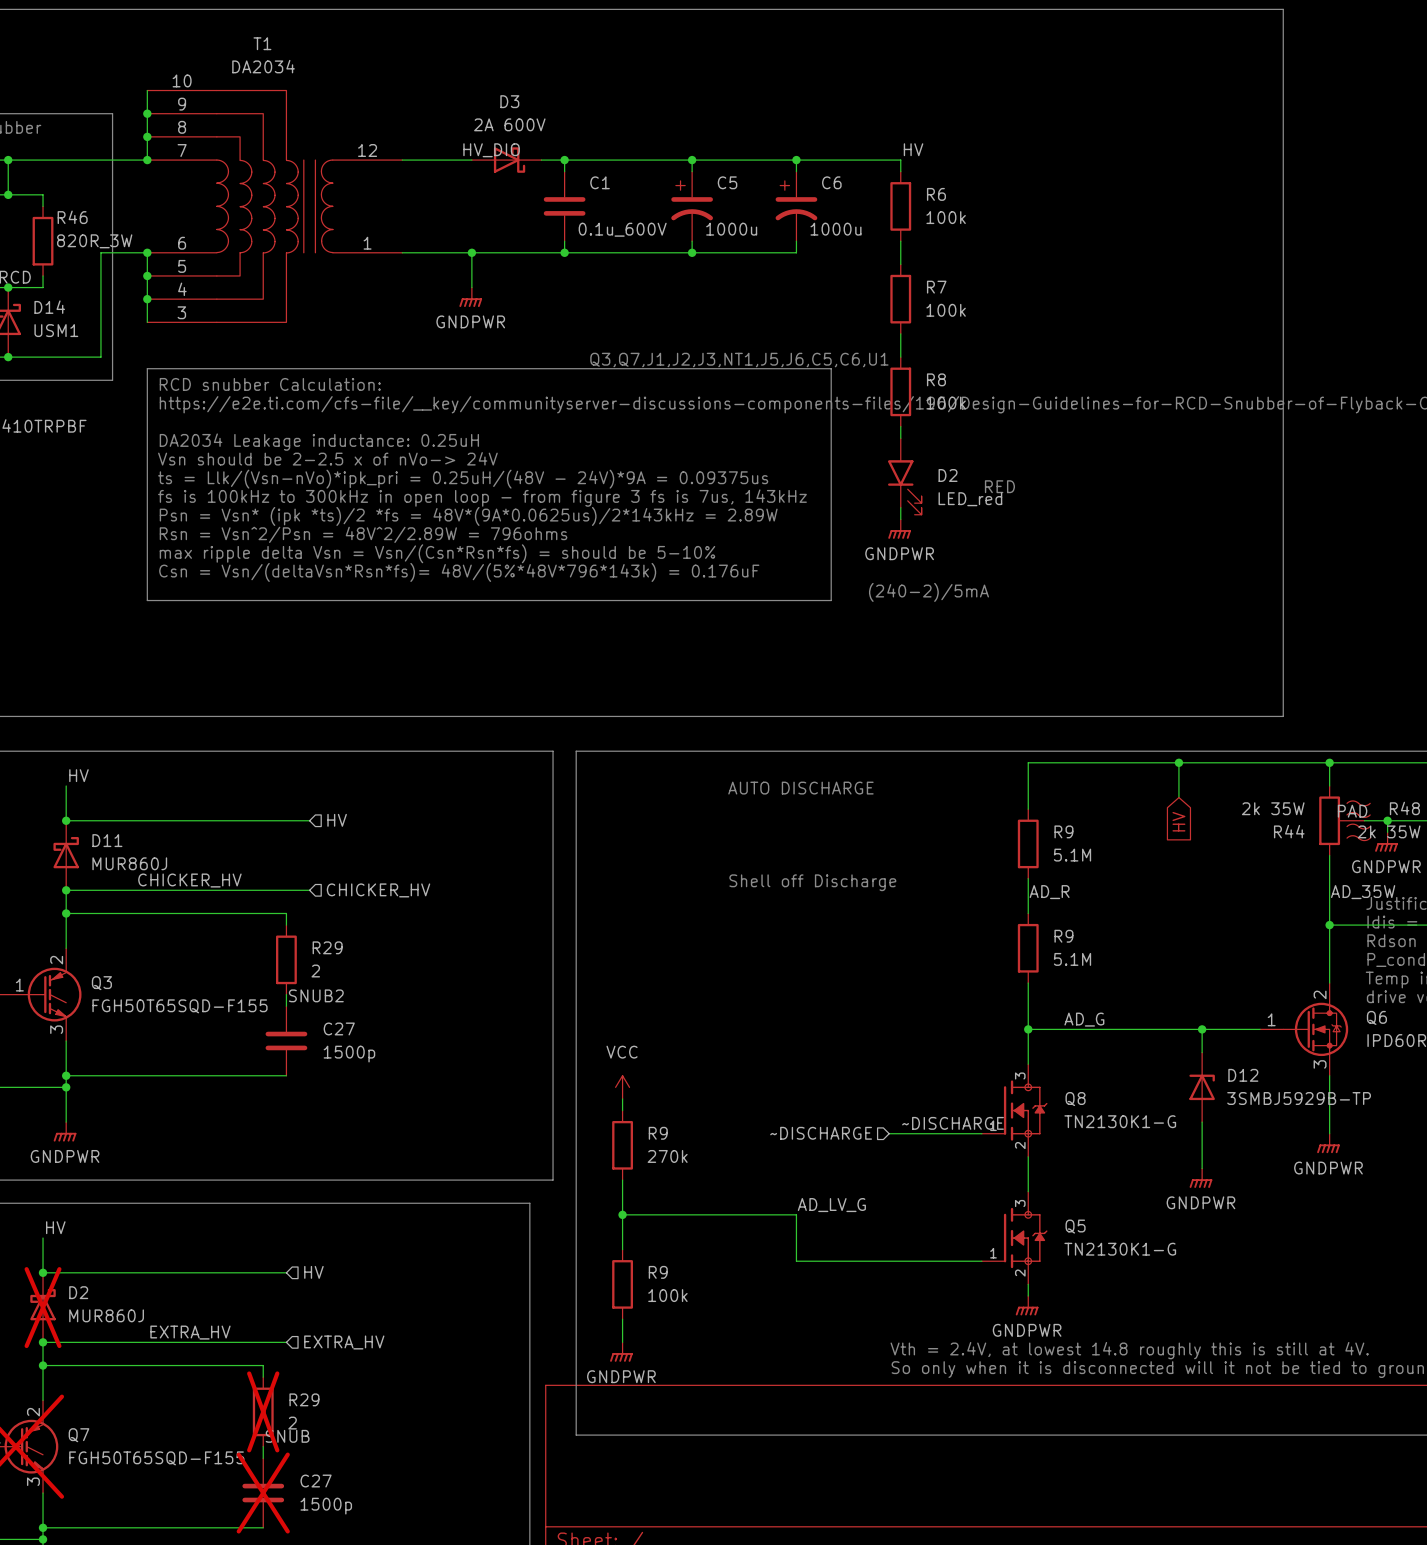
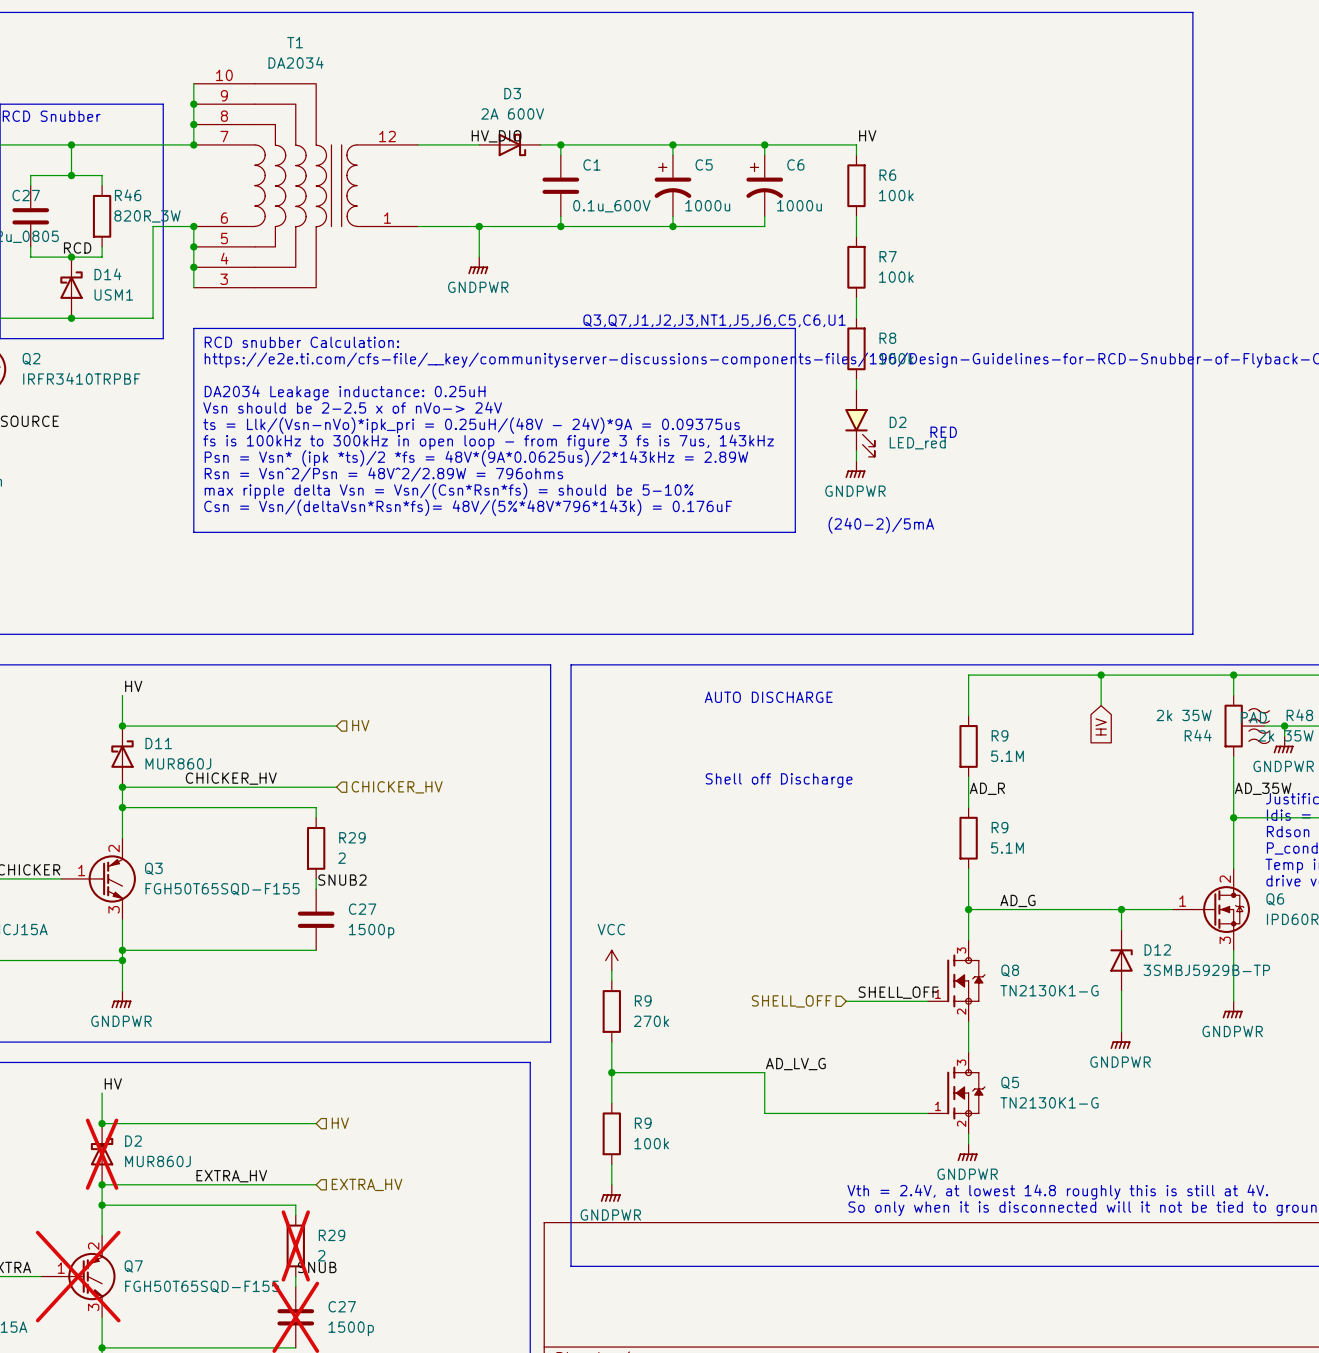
label: ~DISCHARGE (953, 1123) -> SHELL_OFF (898, 992)
hierarchical label: ~DISCHARGE (821, 1133) -> SHELL_OFF (791, 1001)

